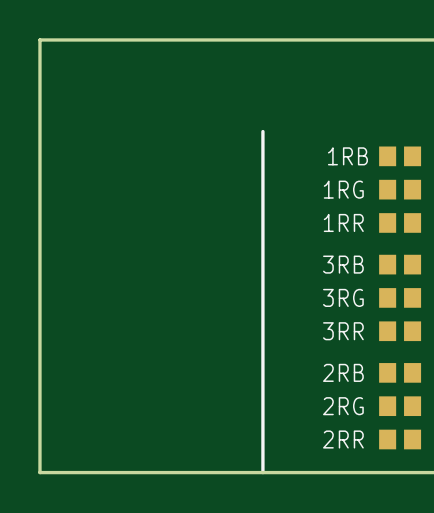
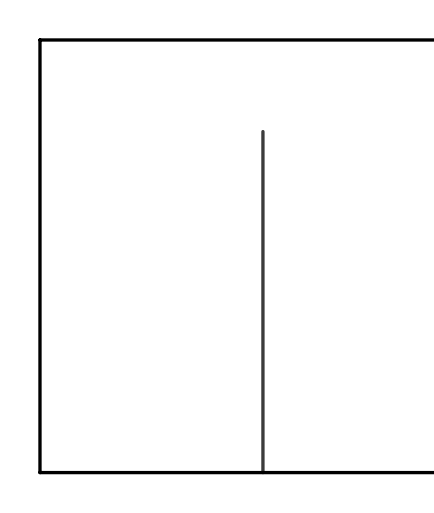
1RB: (400, 156) -> none
1RG: (400, 189) -> none
1RR: (400, 222) -> none
3RB: (400, 264) -> none
3RG: (400, 297) -> none
3RR: (400, 331) -> none
2RB: (400, 372) -> none
2RG: (400, 406) -> none
2RR: (400, 439) -> none

